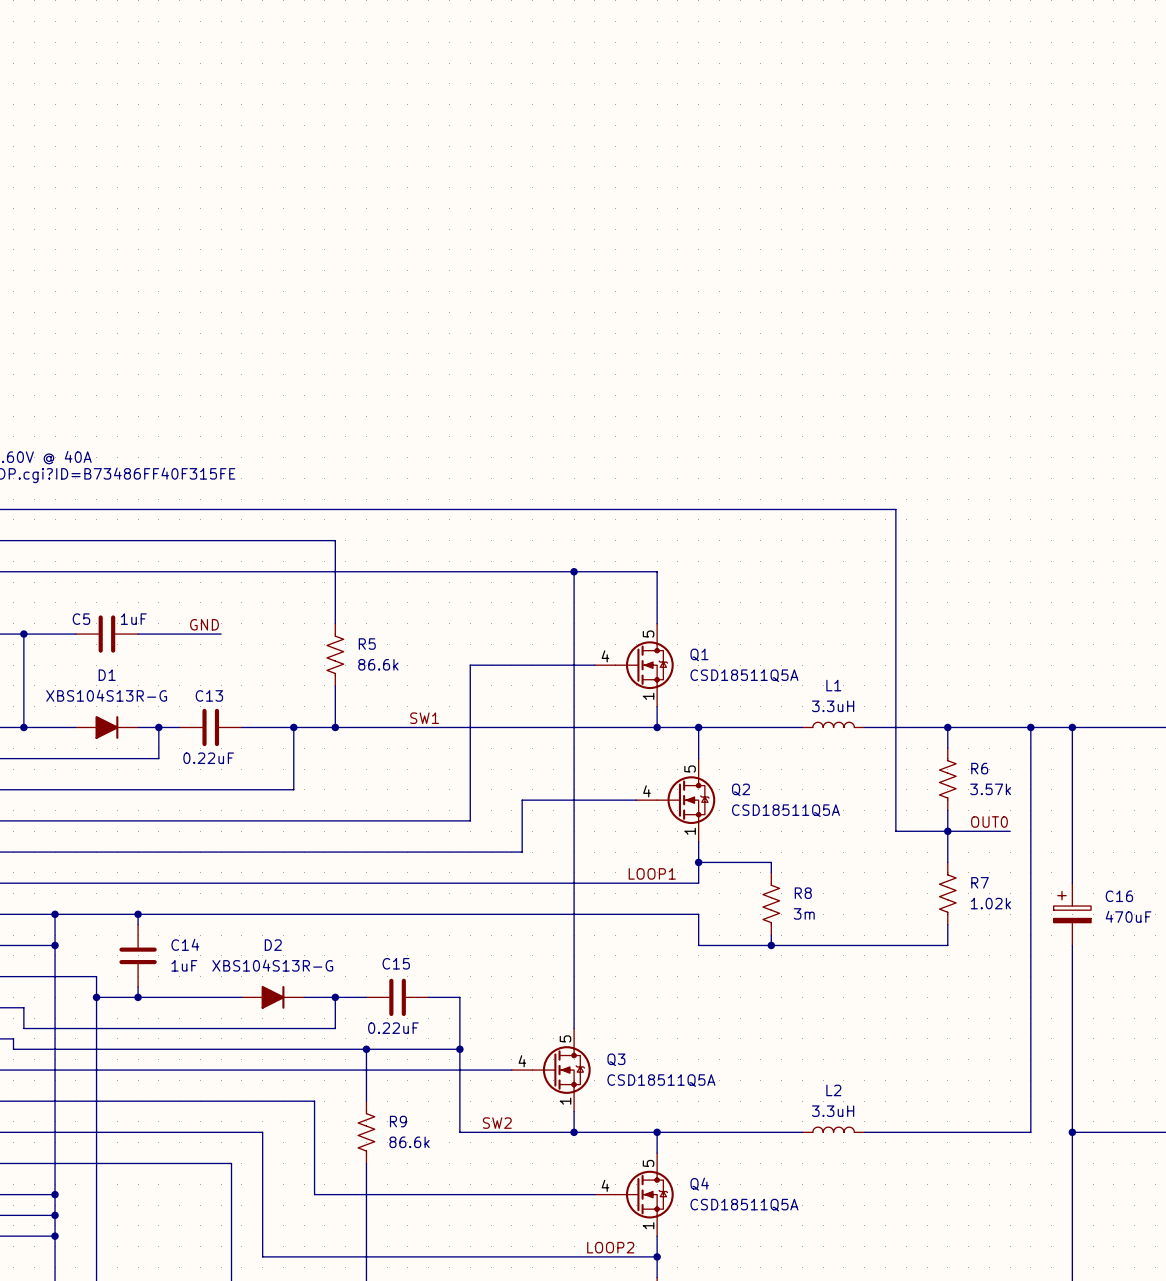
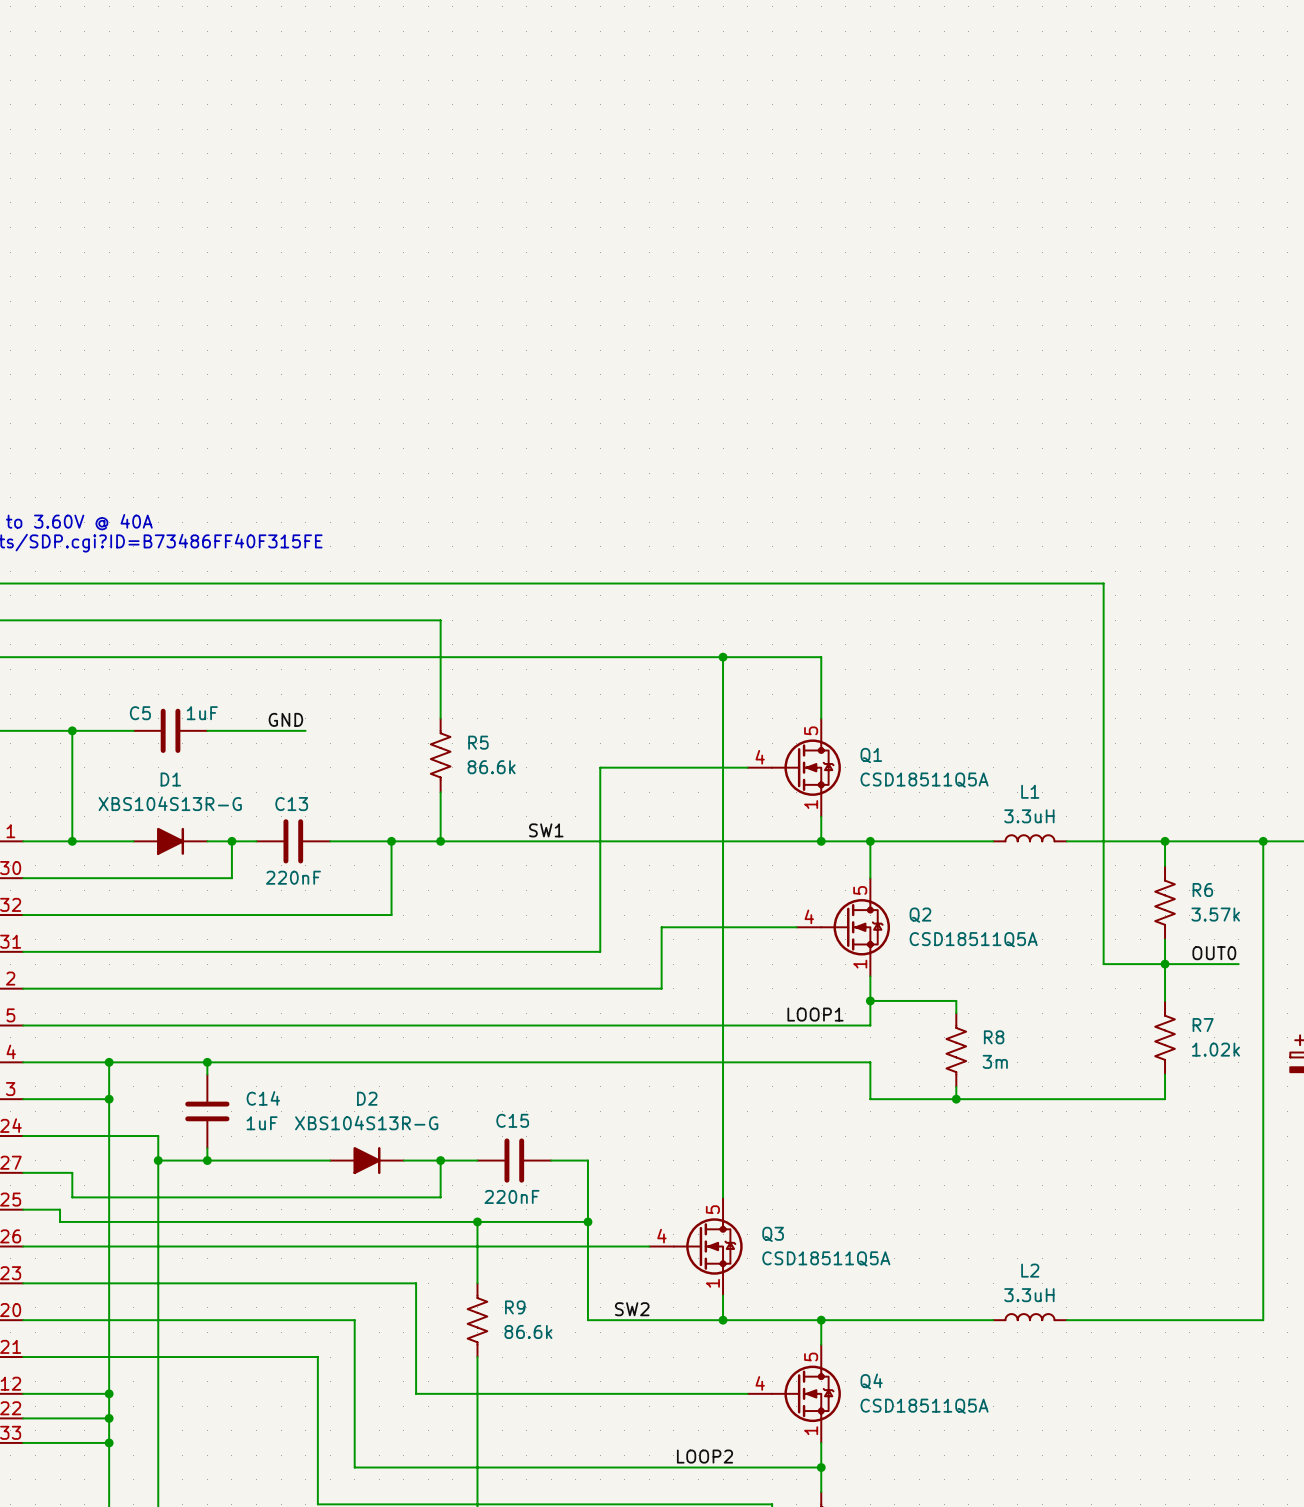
C13 value: 0.22uF (208, 758) -> 220nF (293, 877)
C15 value: 0.22uF (393, 1028) -> 220nF (511, 1196)
label position: LOOP2 (610, 1247) -> LOOP2 (705, 1456)

